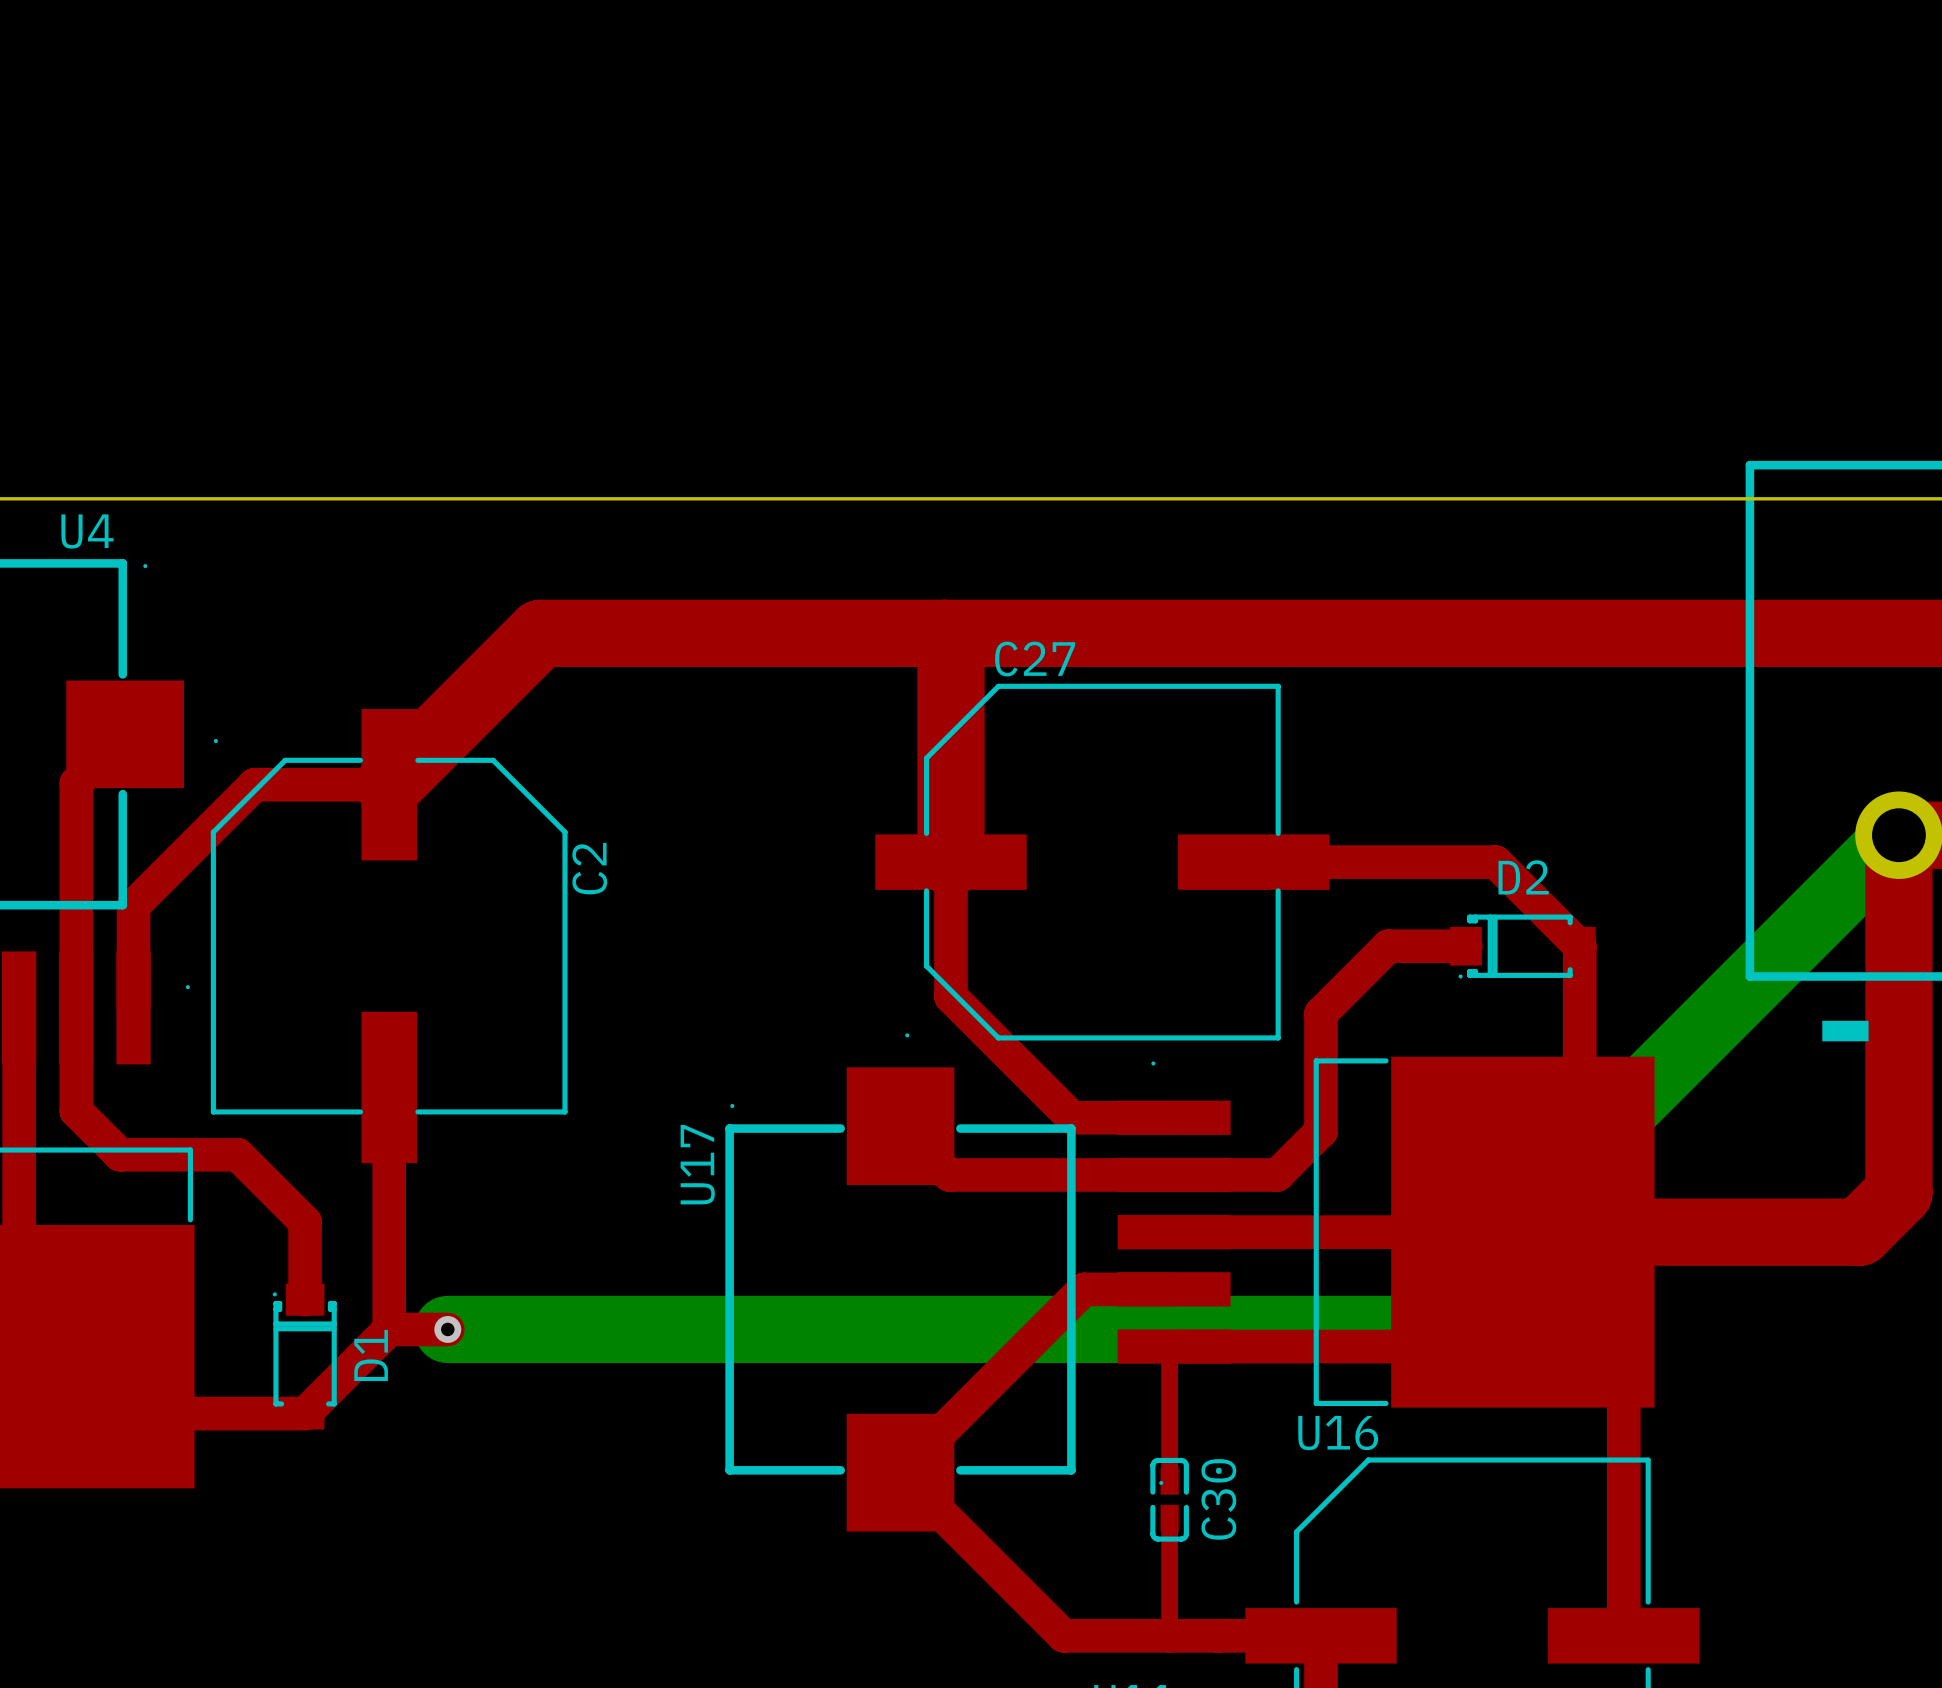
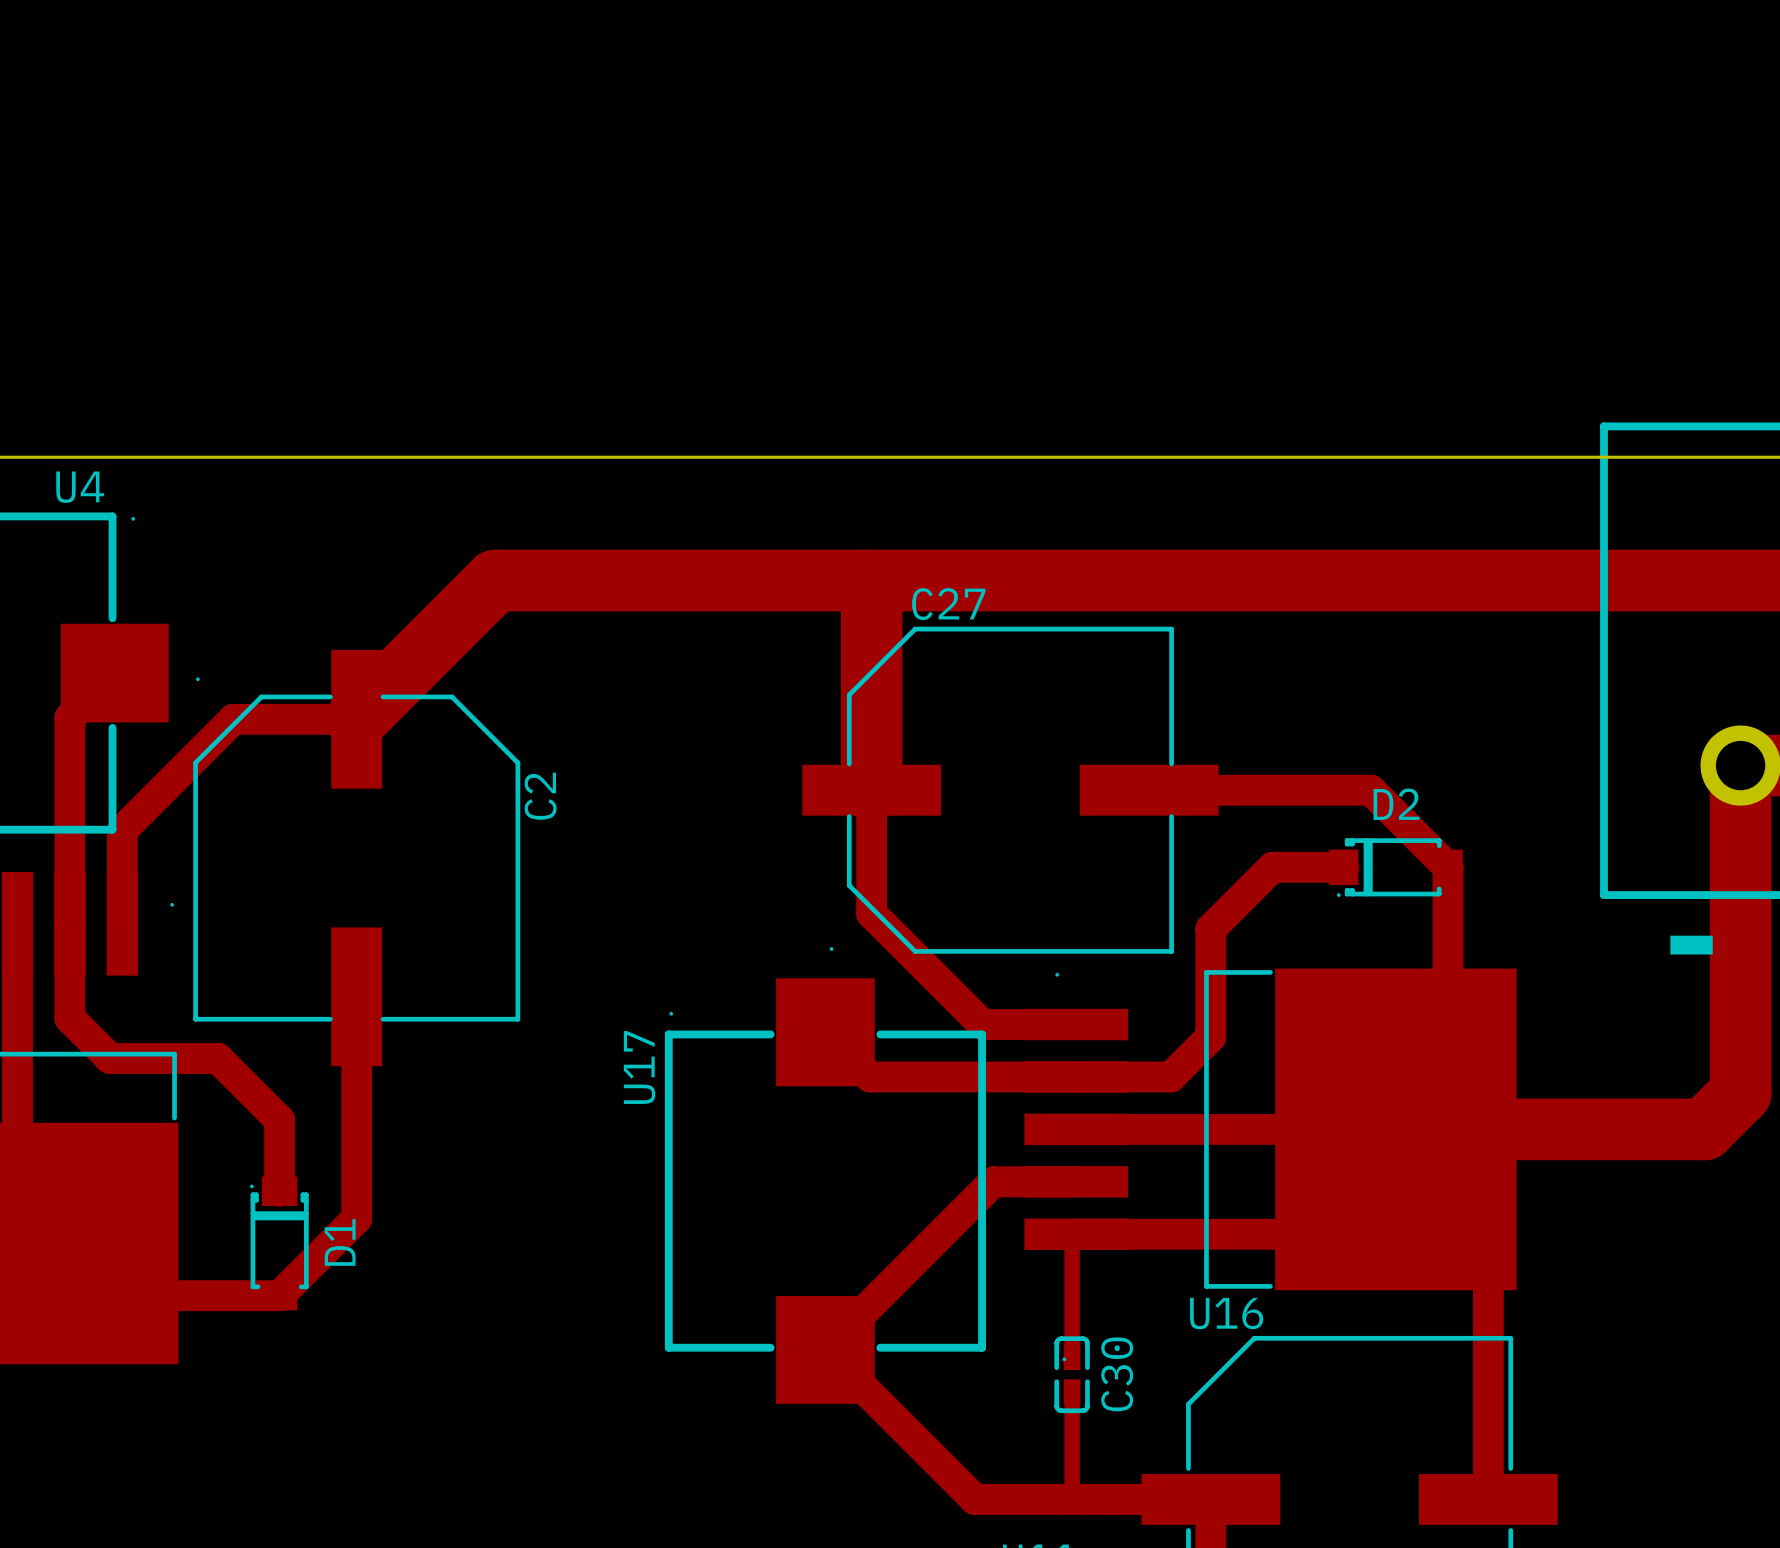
bottom track: (1898, 835) (1404, 1329) (447, 1329) -> none
top track: (389, 1329) (447, 1329) -> none
via: (447, 1329) -> none

